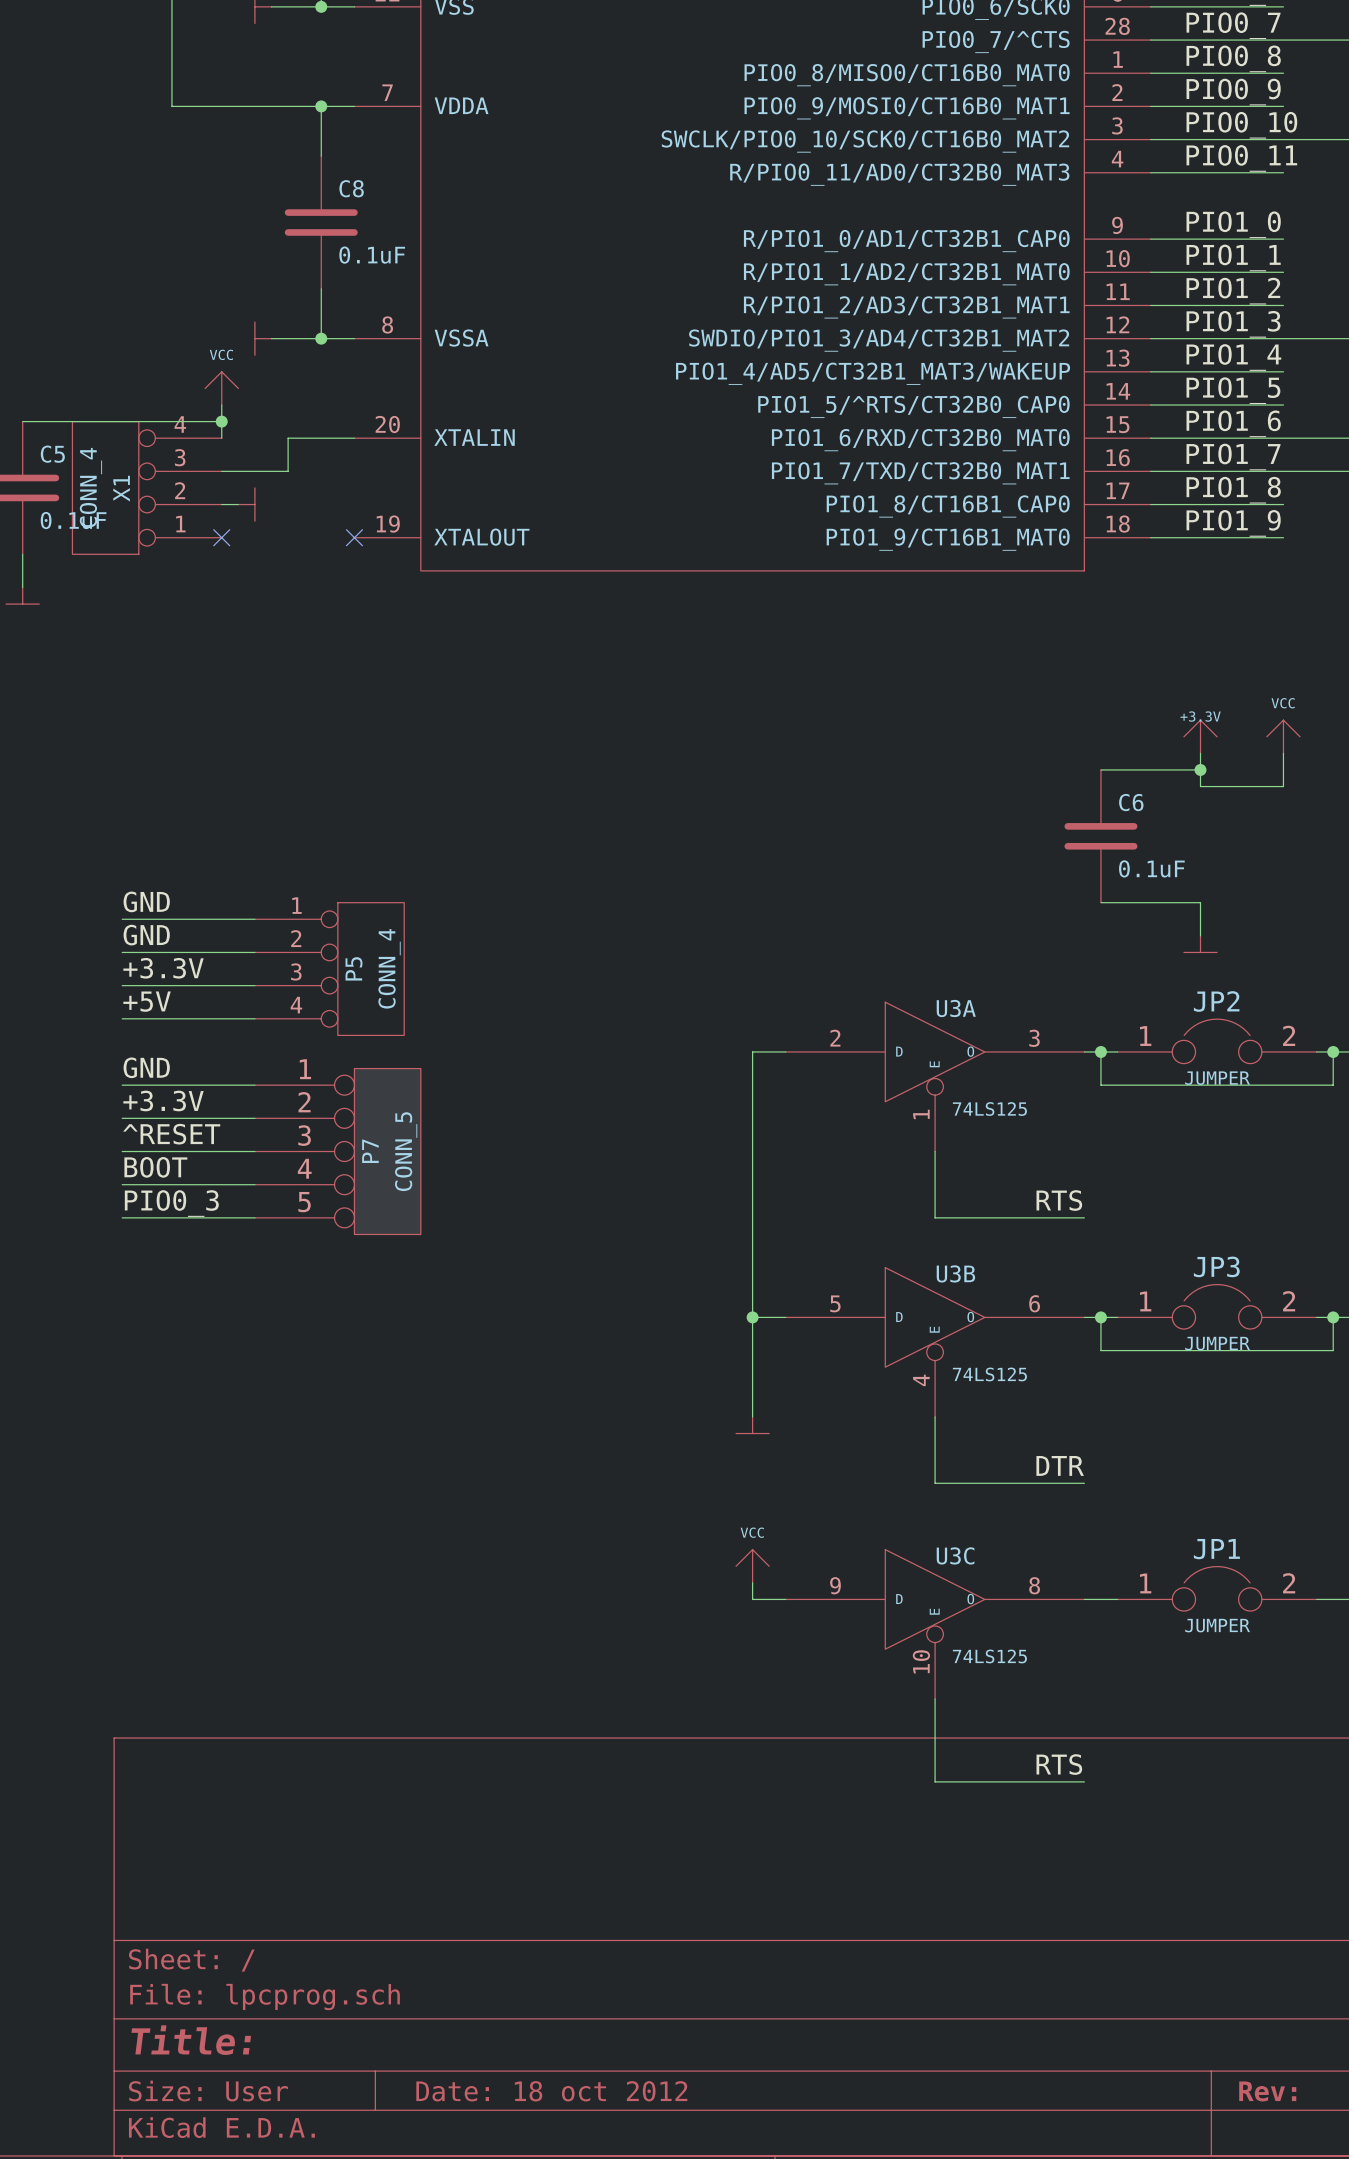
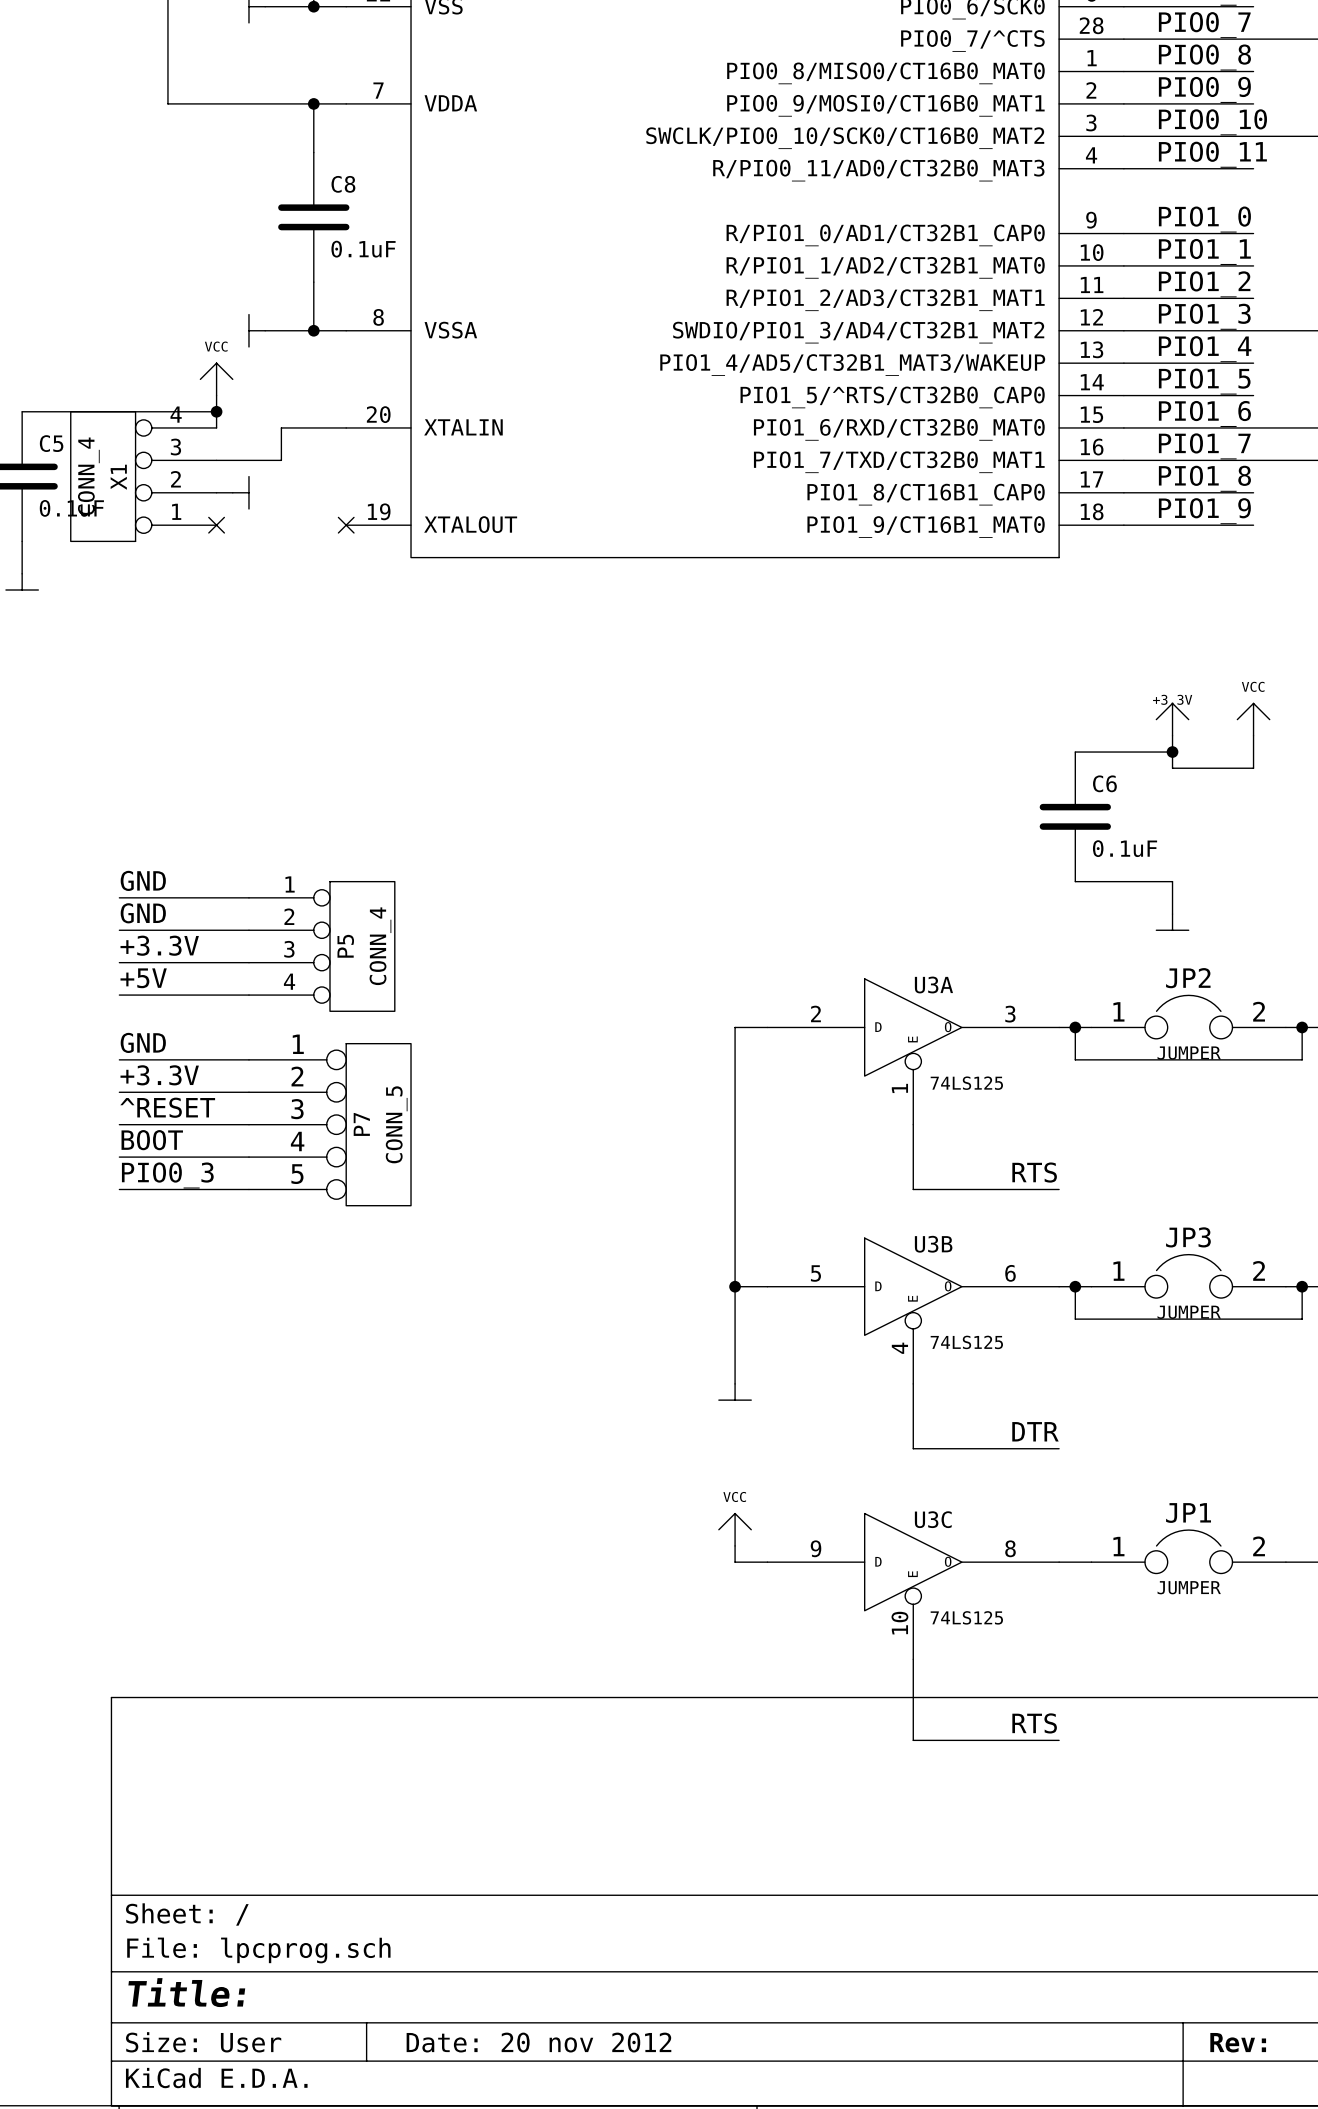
title block: Date: 18 oct 2012 (551, 2091) -> Date: 20 nov 2012 (538, 2042)

